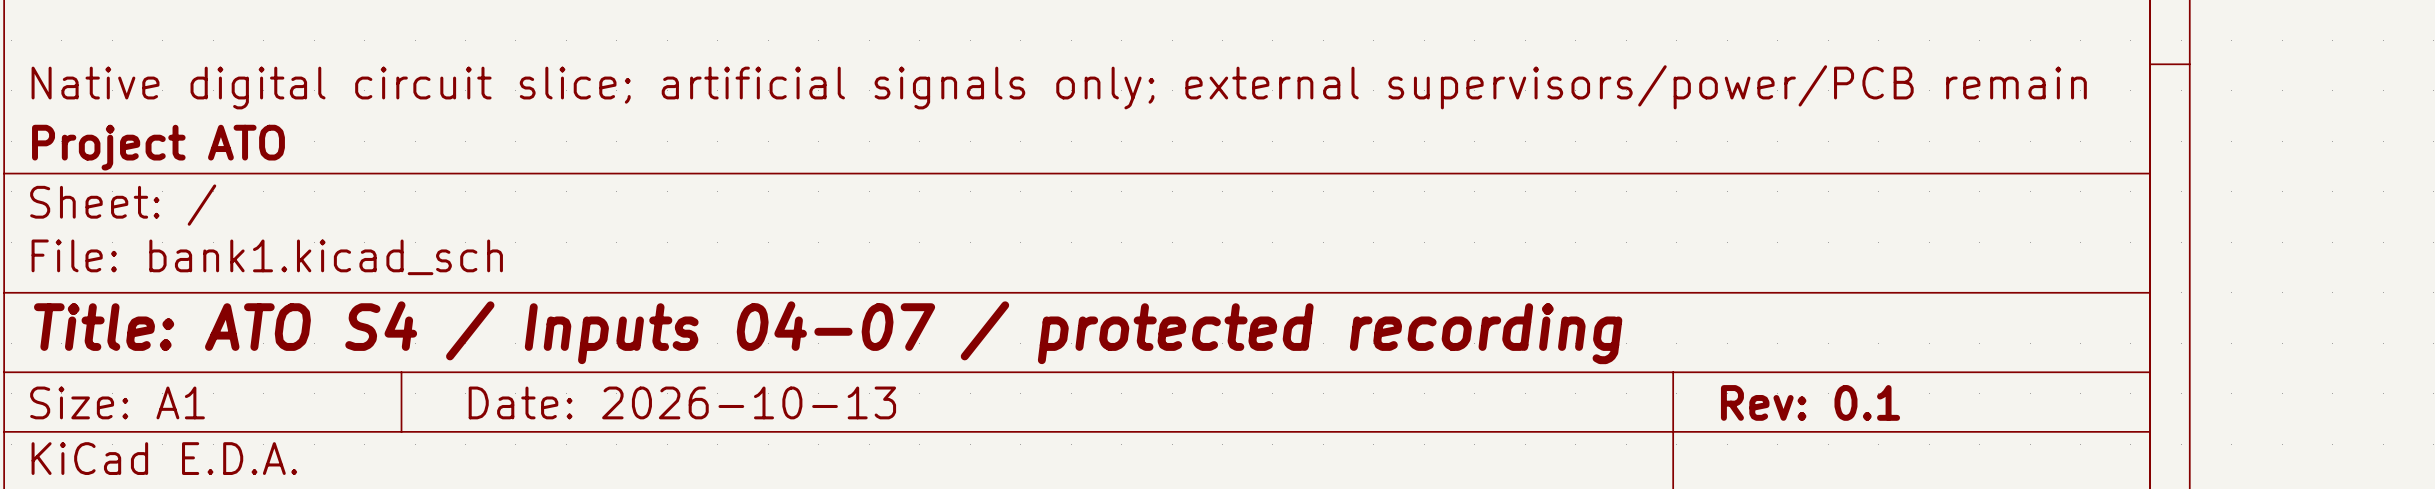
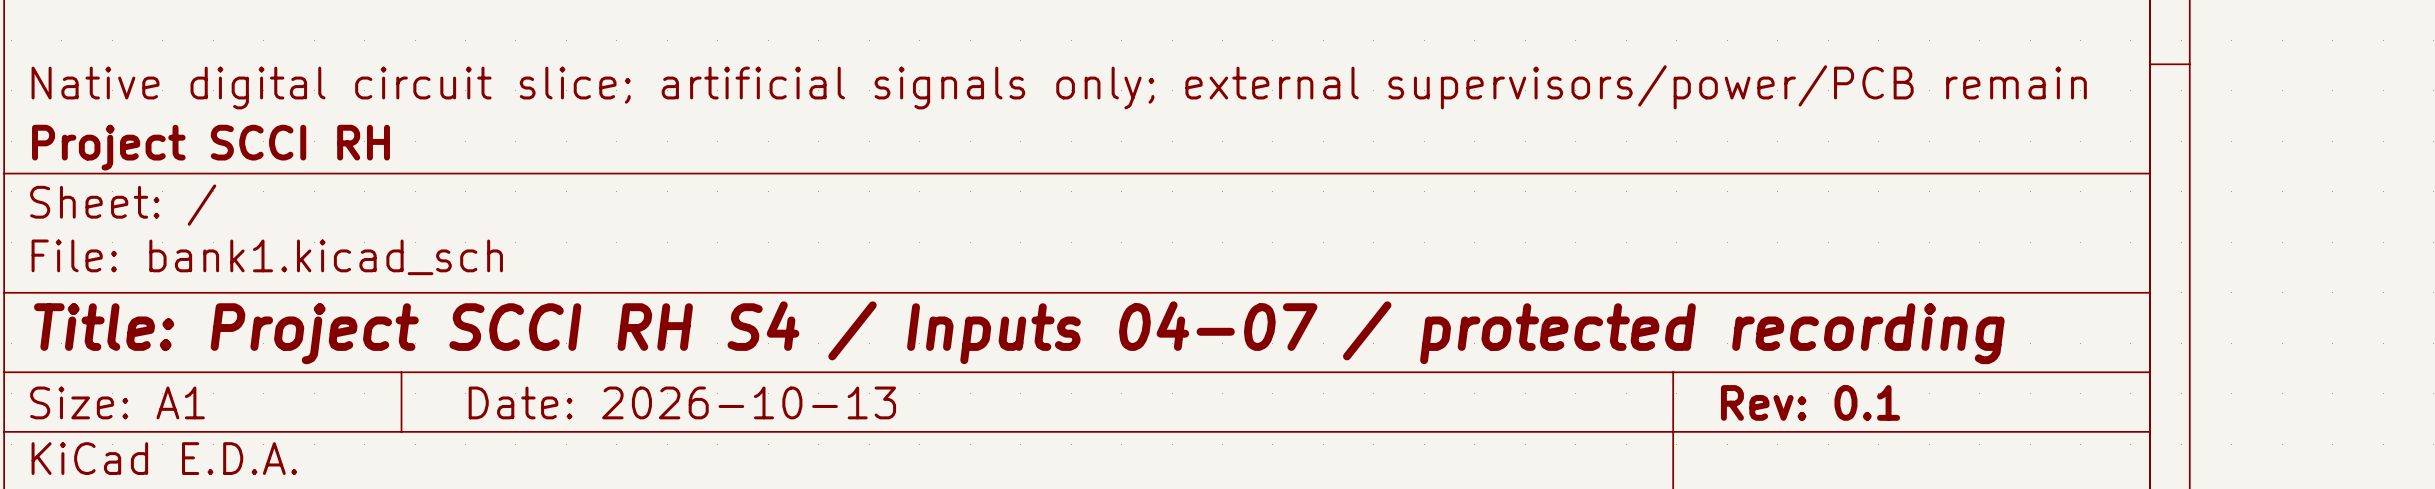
title block: Project ATO (158, 147) -> Project SCCI RH (210, 147)
title block: Title: ATO S4 / Inputs 04-07 / protected recording (828, 332) -> Title: Project SCCI RH S4 / Inputs 04-07 / protected recording (1019, 332)

